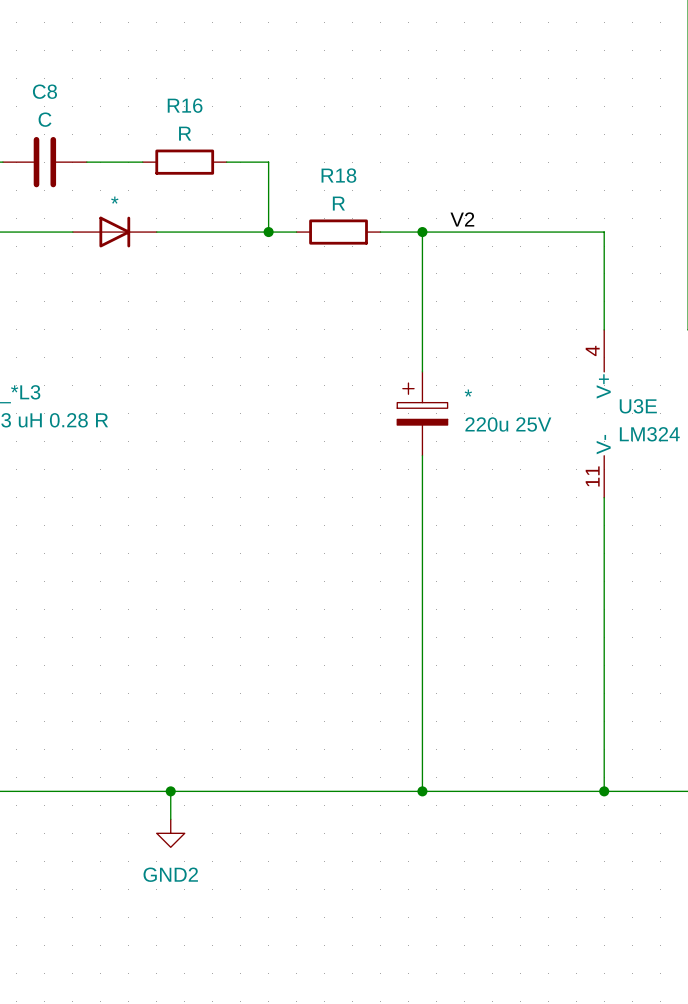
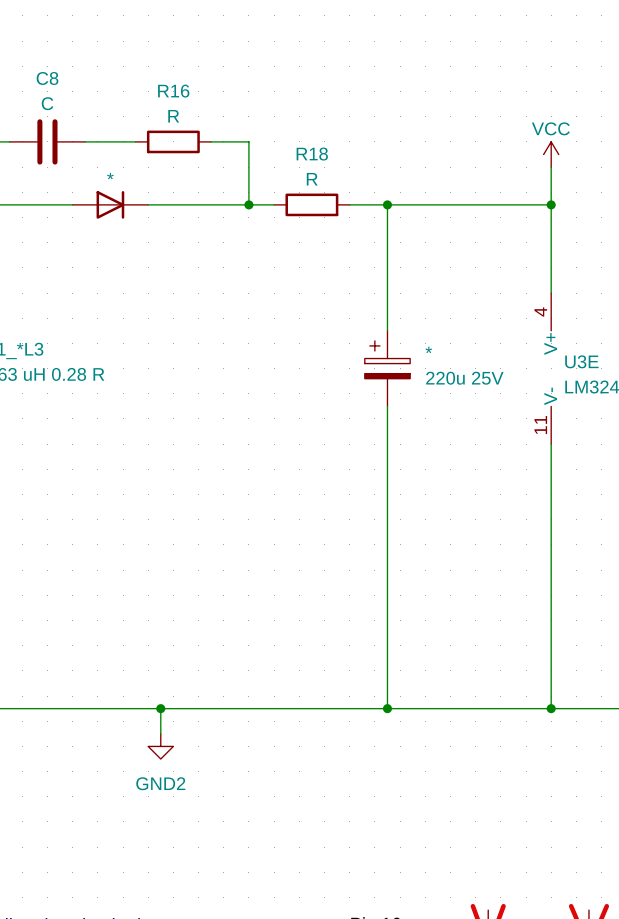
power symbol: none -> VCC (551, 154)
wire: none -> (551, 167) (551, 204)
label: V2 (462, 219) -> none
junction: none -> (551, 204)

